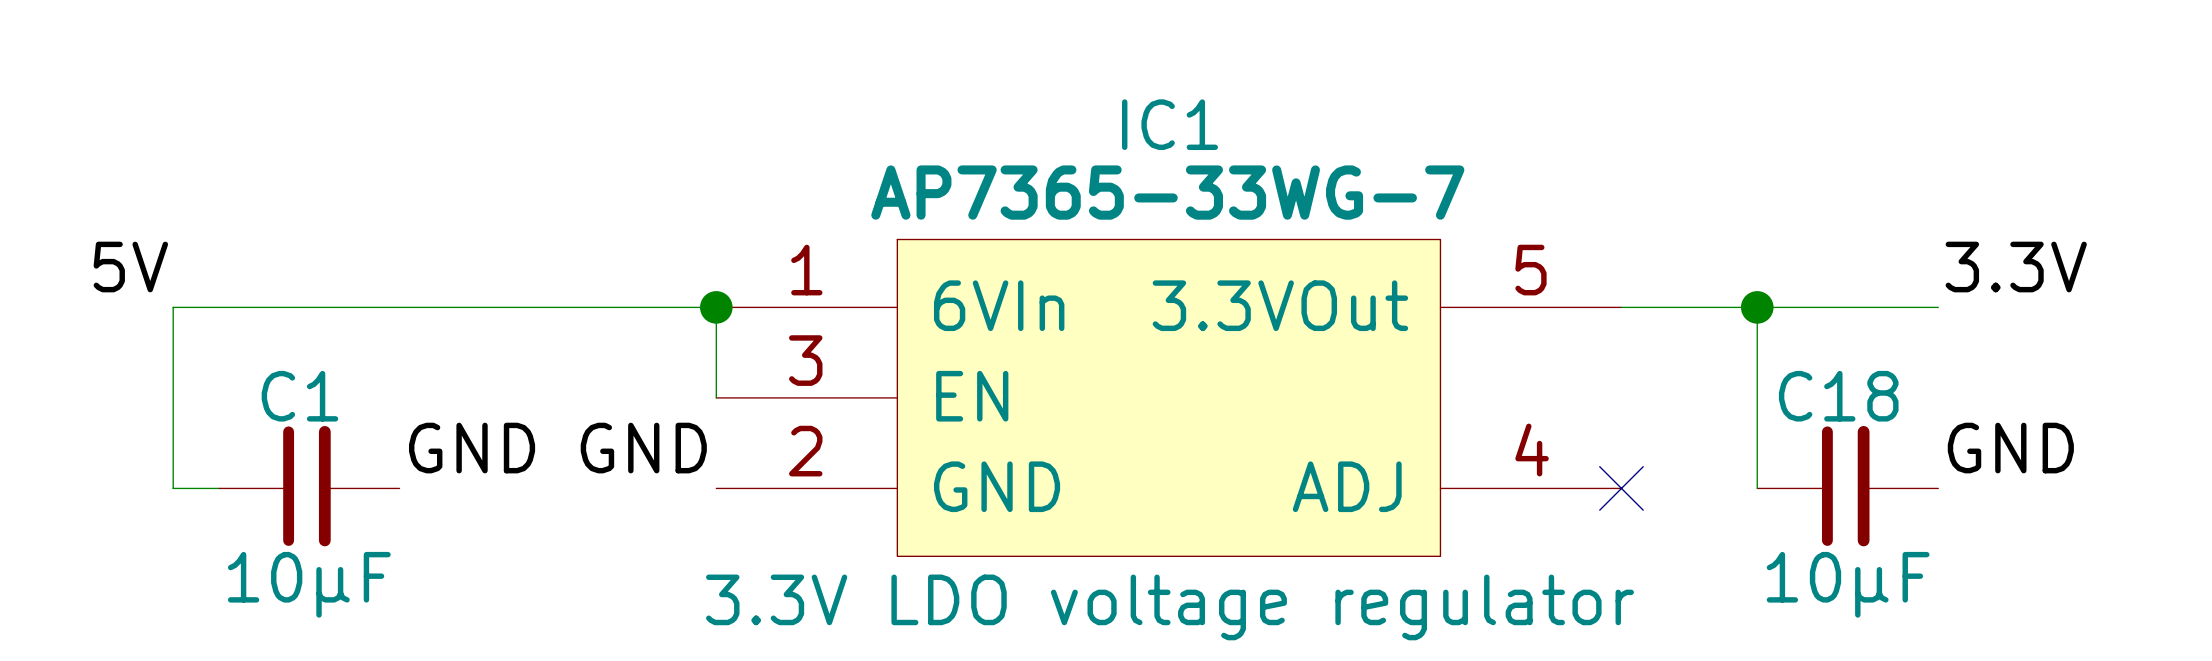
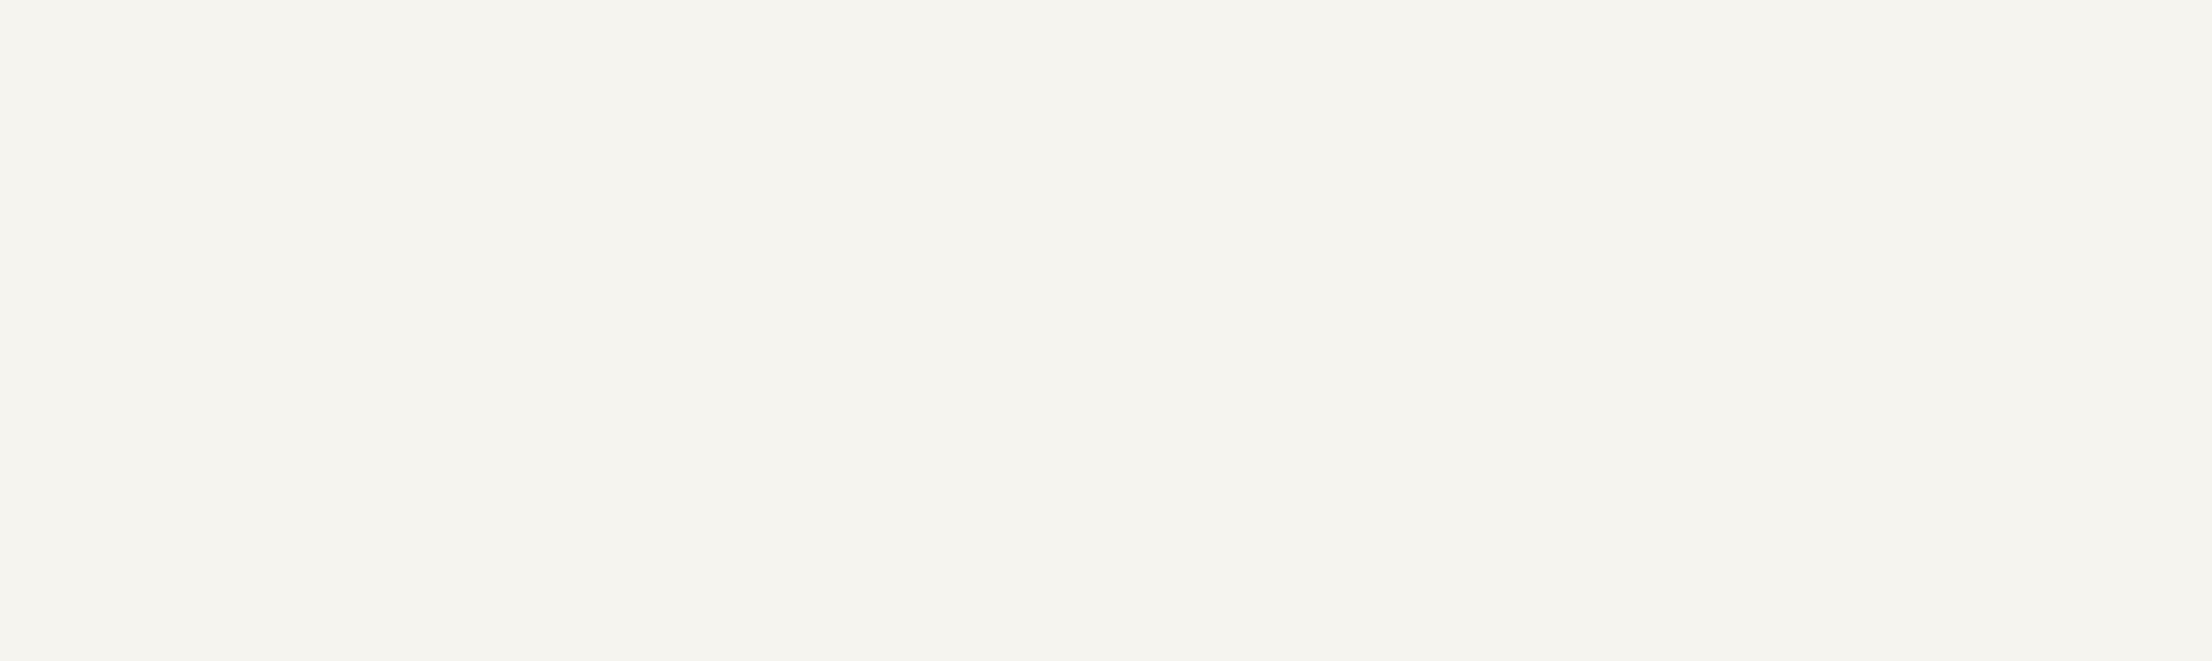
label: 5V (130, 267) -> none
label: 3.3V (2016, 267) -> none
junction: (716, 307) -> none
wire: (1621, 307) (1938, 307) -> none
wire: (1757, 307) (1757, 488) -> none
junction: (1757, 307) -> none
wire: (716, 397) (716, 307) (173, 307) (173, 488) (218, 488) -> none
IC1: AP7365-33WG-7 (1168, 397) -> none
label: GND (472, 448) -> none
label: GND (643, 448) -> none
label: GND (2010, 448) -> none
C1: 10µF (308, 486) -> none
C18: 10µF (1847, 486) -> none
no-connect mark: (1621, 488) -> none

